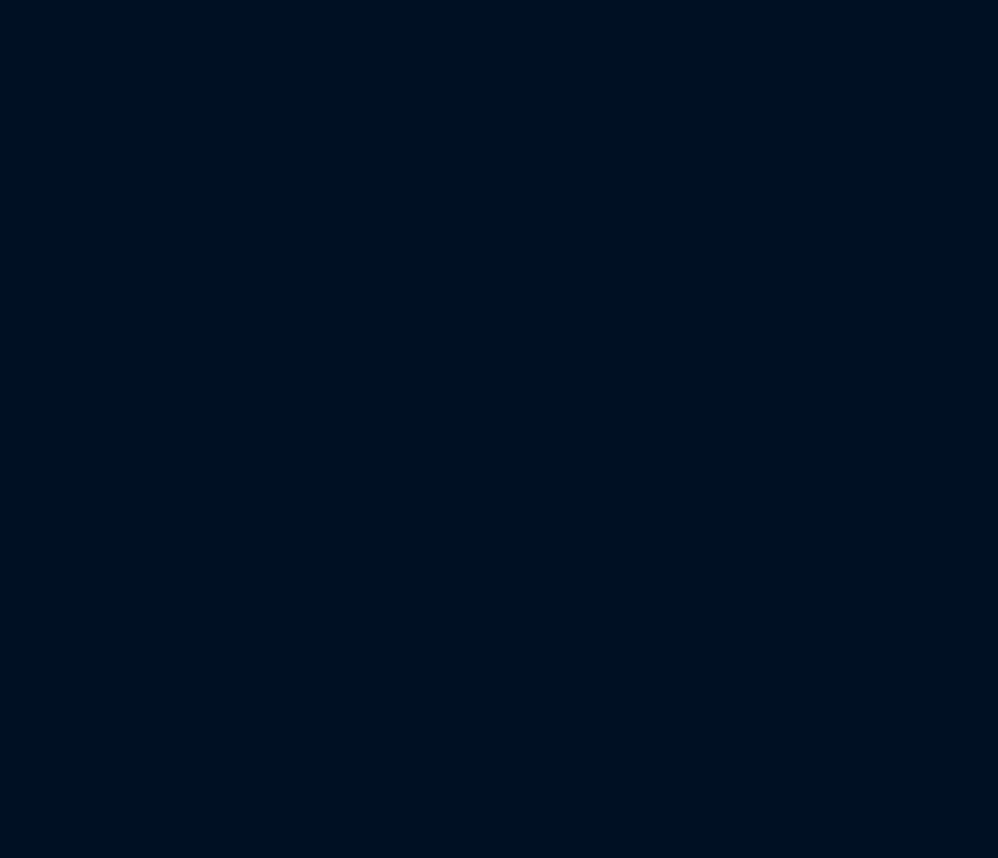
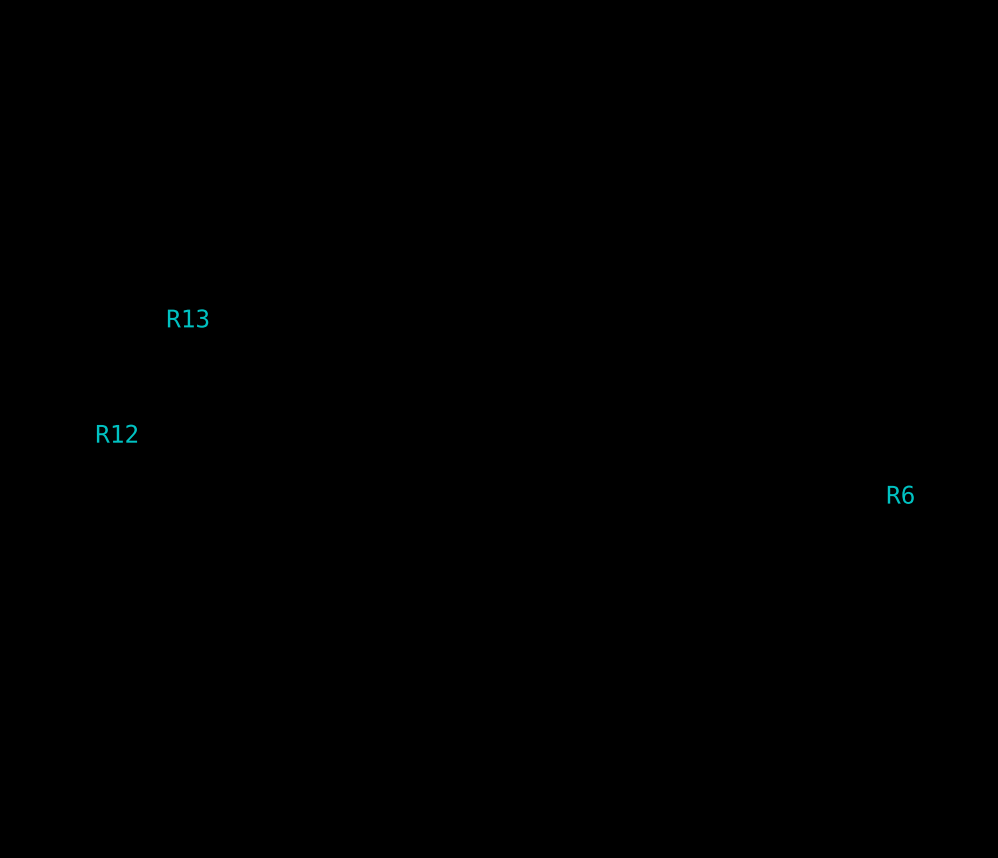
R13: none -> (188, 318)
R12: none -> (116, 433)
R6: none -> (900, 494)

